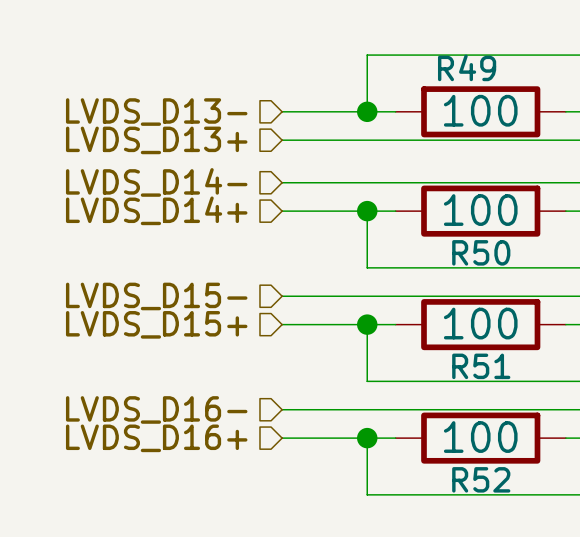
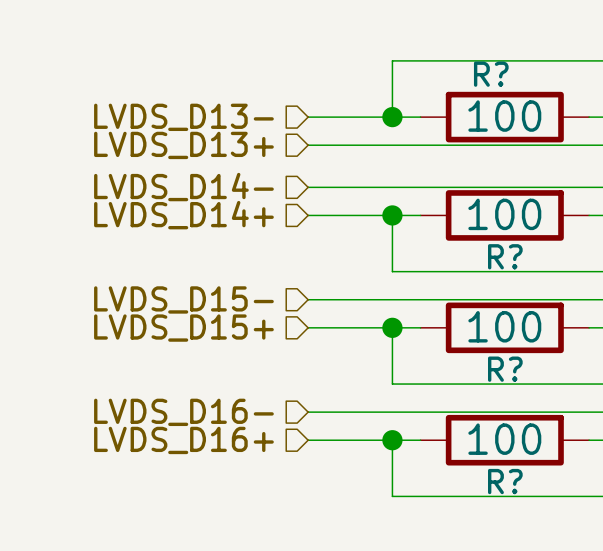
R49 name: R49 (467, 67) -> R? (491, 74)
R50 name: R50 (481, 252) -> R? (505, 256)
R51 name: R51 (481, 366) -> R? (505, 369)
R52 name: R52 (481, 479) -> R? (505, 481)

